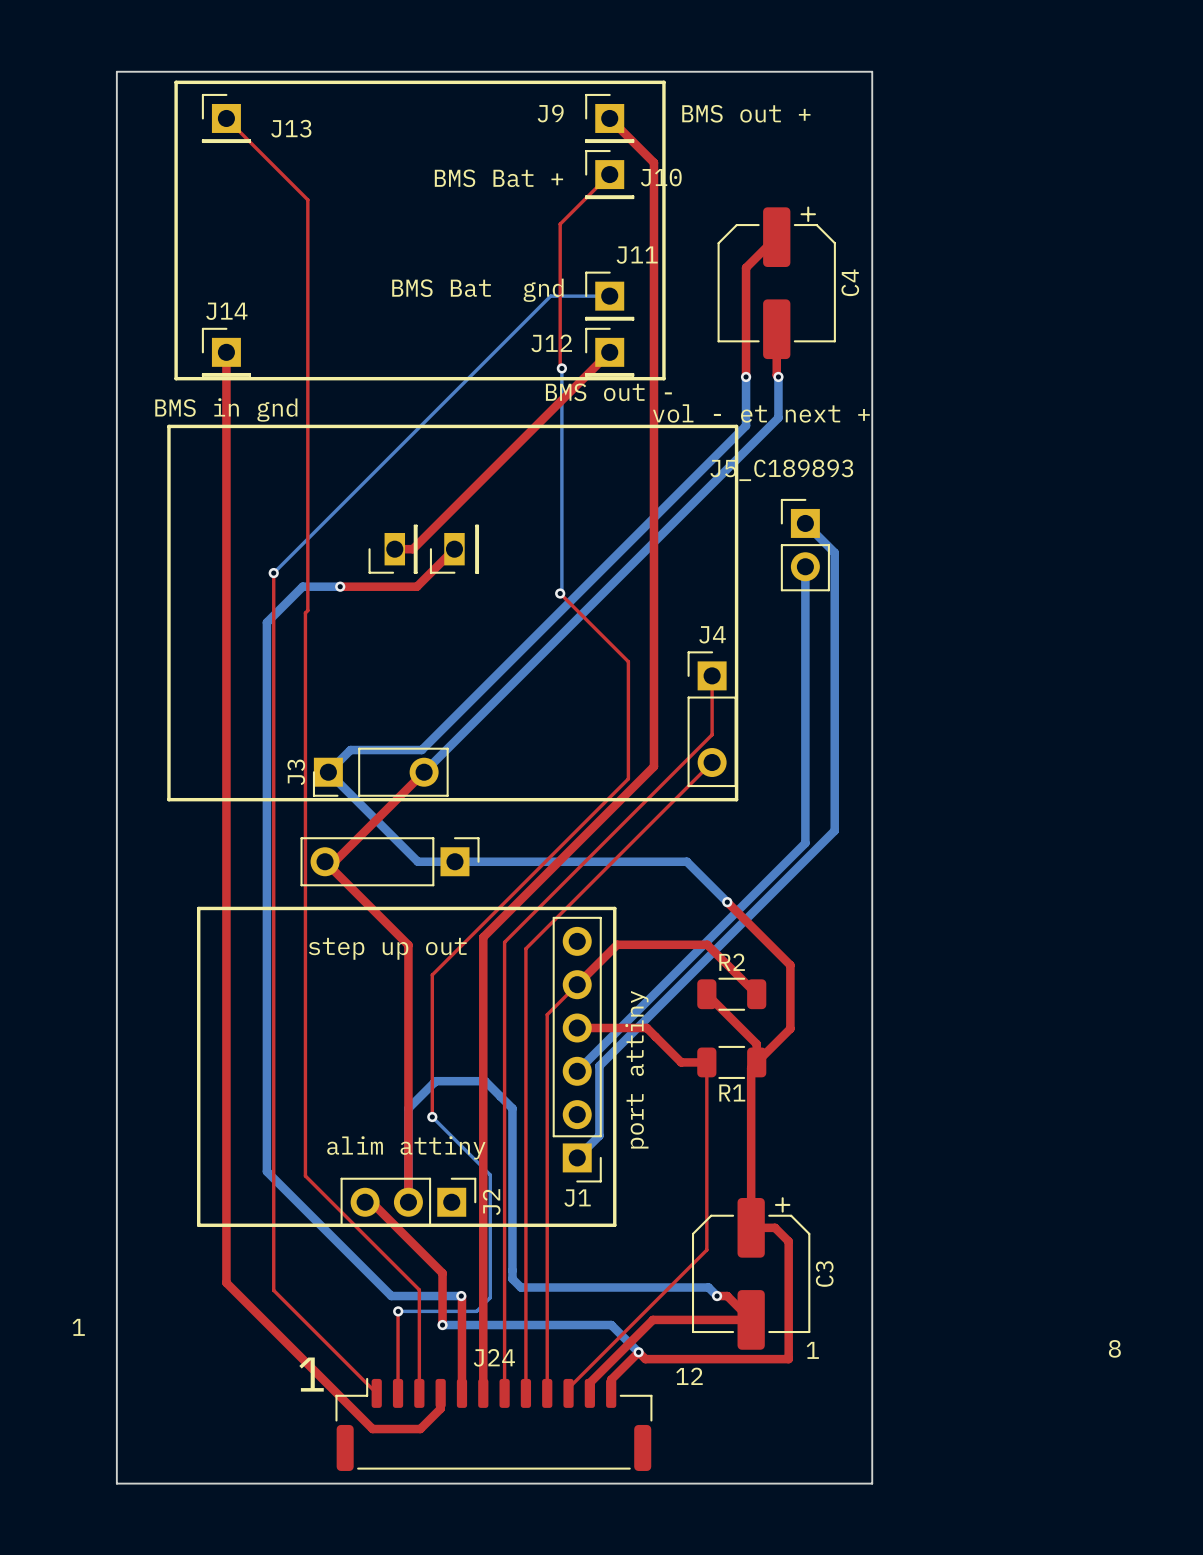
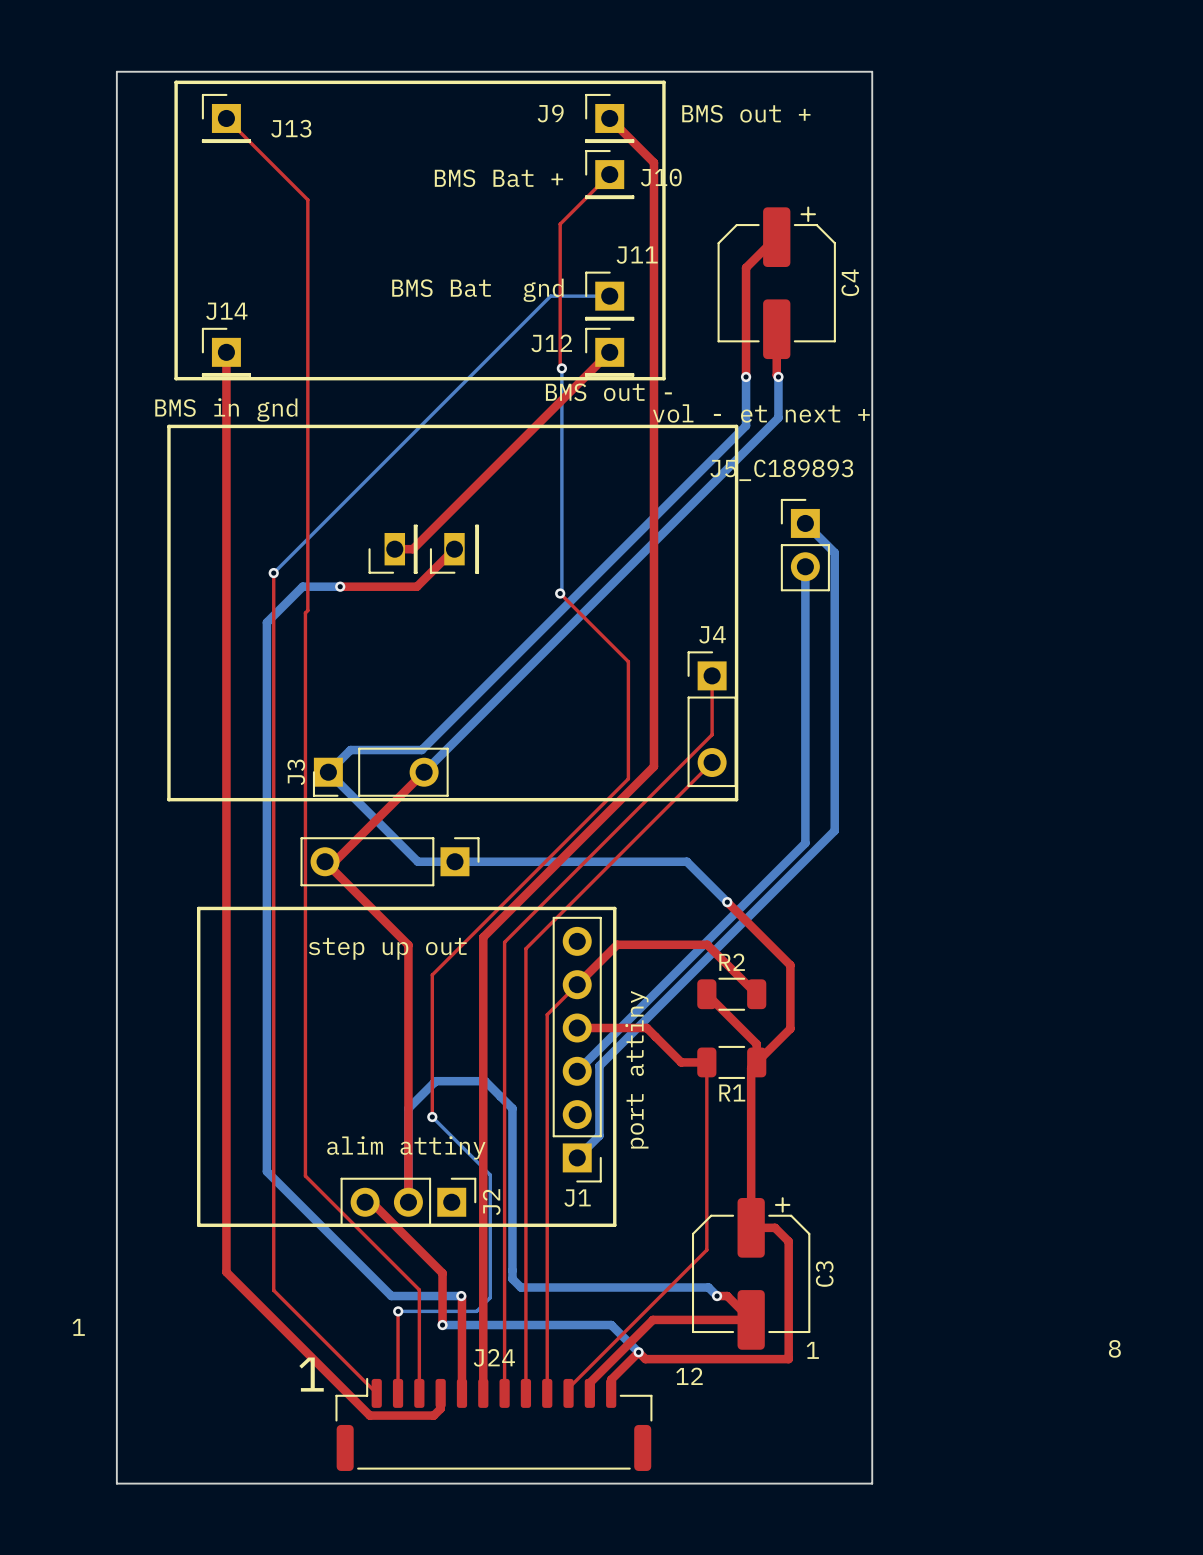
top track: (226, 1272) (226, 1282) (372, 1429) (420, 1429) (433, 1415) -> (226, 1272) (369, 1415) (433, 1415)

